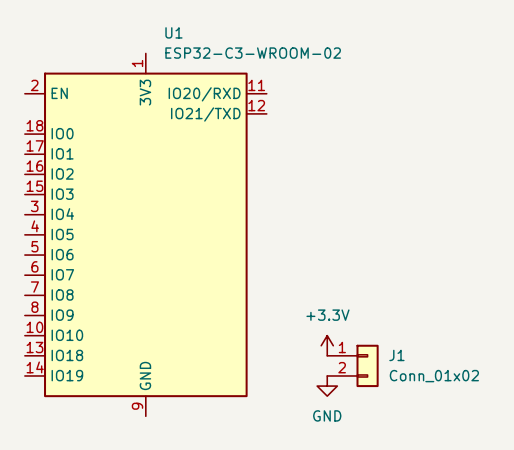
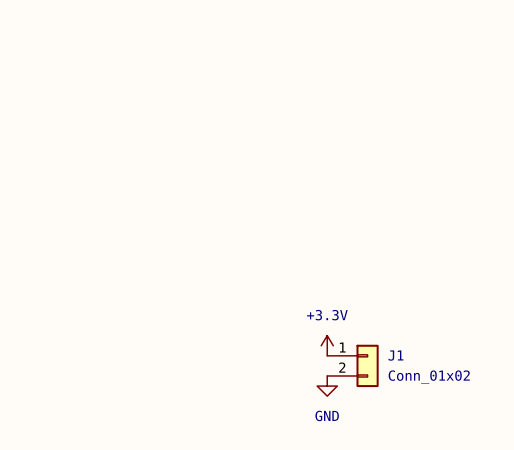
U1: ESP32-C3-WROOM-02 (145, 234) -> none

